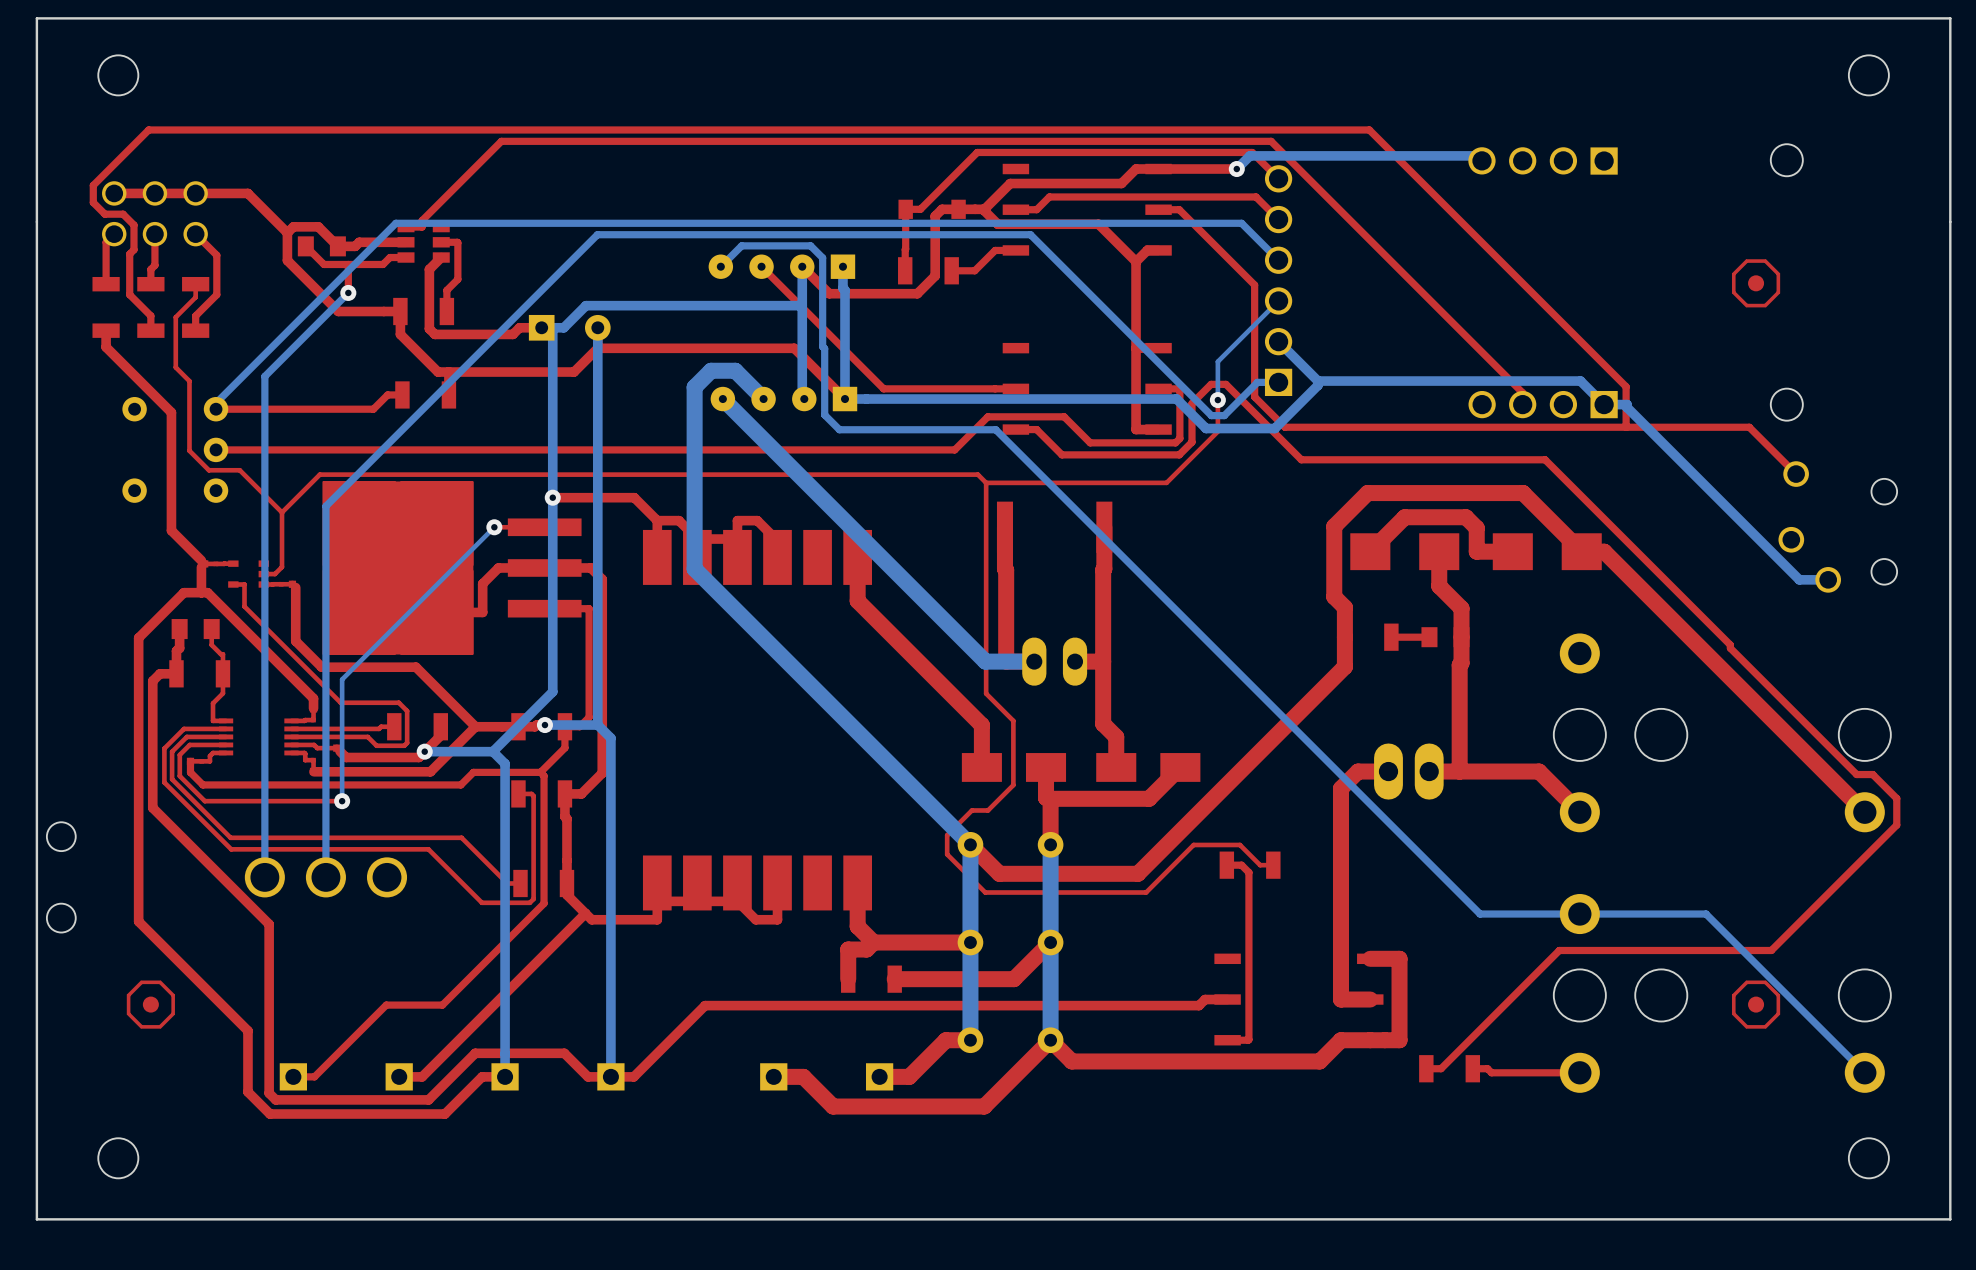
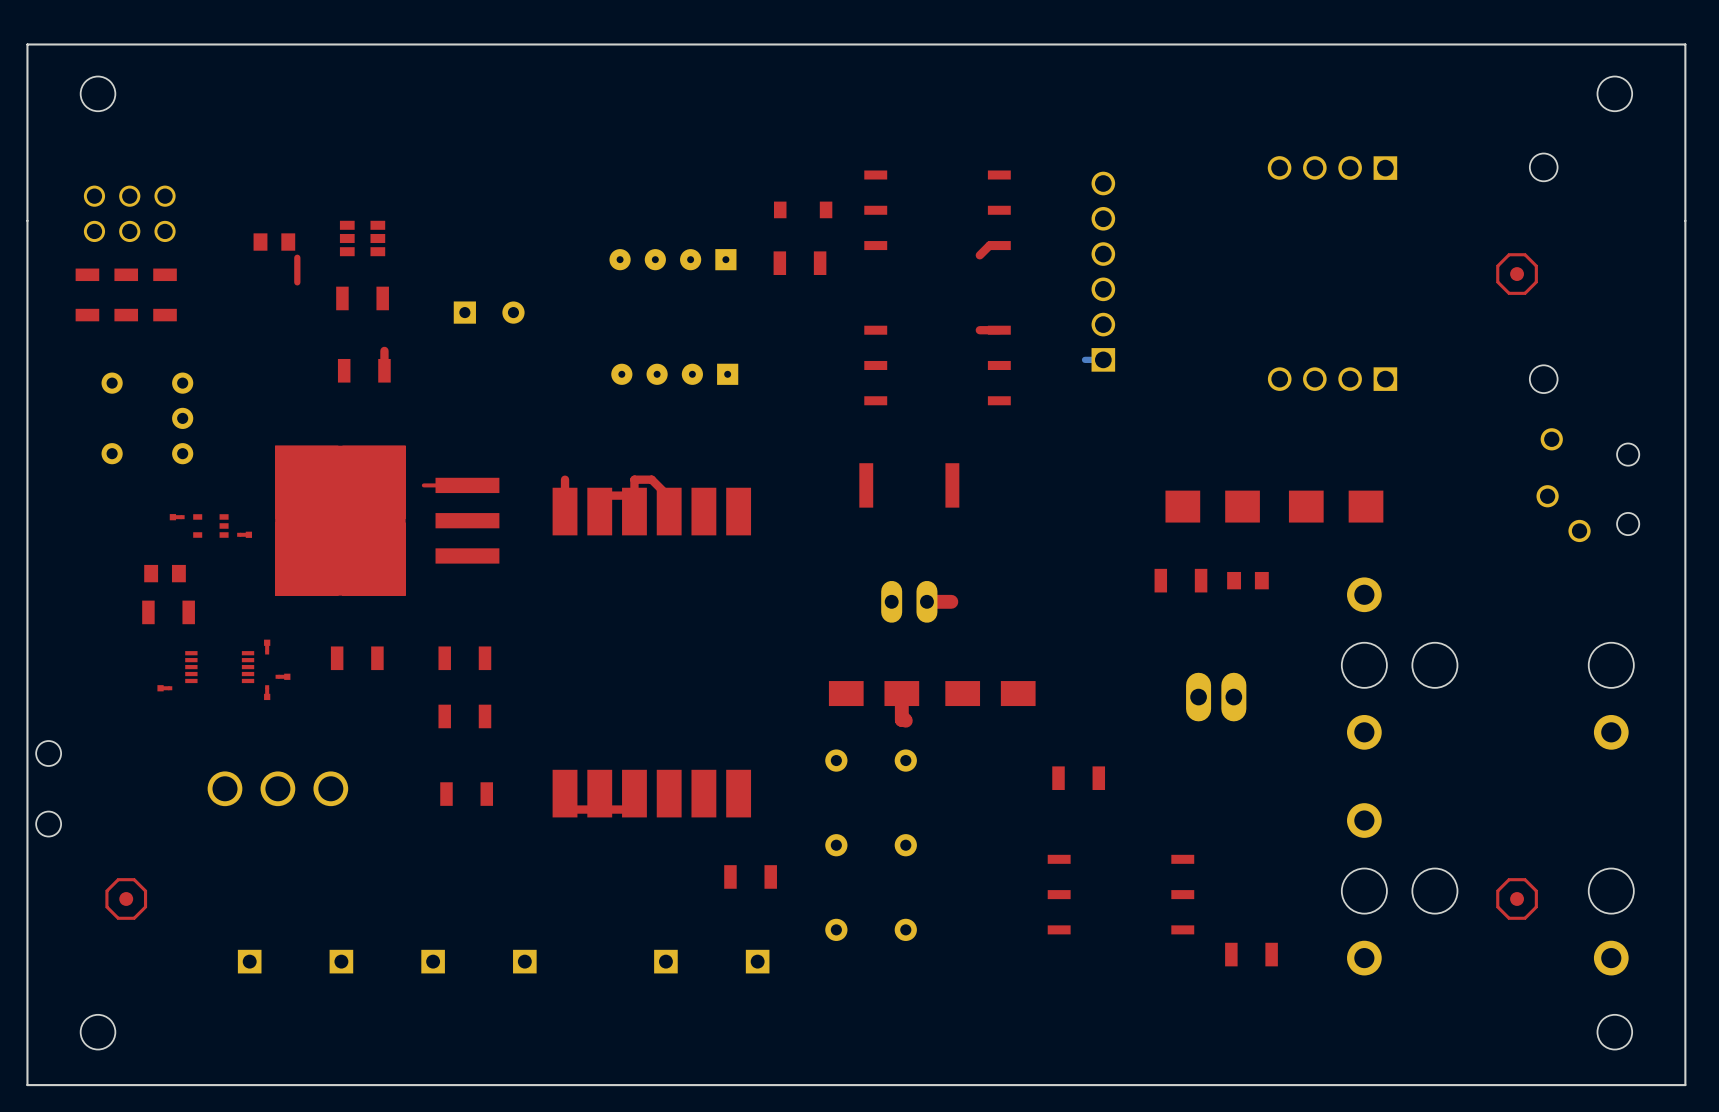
bottom track: (1481, 160) (1477, 155) (1249, 155) (1236, 169) -> none
top track: (1236, 169) (1136, 169) (1121, 183) (1010, 183) (983, 210) -> none
via: (1236, 169) -> none
top track: (1278, 178) (1252, 152) (977, 152) (920, 209) (905, 209) (905, 270) -> none
top track: (114, 193) (247, 193) (287, 232) -> none
top track: (1015, 209) (1036, 209) (1049, 196) (1256, 196) (1278, 219) -> none
top track: (1158, 209) (1179, 209) (1254, 285) (1254, 396) (1284, 427) (1749, 427) (1796, 474) -> none
top track: (406, 227) (422, 227) (422, 220) (501, 141) (1271, 141) (1522, 392) (1522, 404) -> none
top track: (287, 232) (293, 226) (318, 226) (337, 246) (355, 246) (359, 242) (406, 242) -> none
top track: (287, 232) (287, 260) (338, 311) (400, 311) (400, 334) (438, 372) (574, 372) (597, 348) -> none
top track: (114, 234) (106, 242) (106, 284) -> none
top track: (154, 234) (154, 265) (150, 269) (150, 284) -> none
top track: (195, 234) (216, 255) (216, 294) (195, 315) (195, 330) -> none
top track: (441, 242) (457, 242) (457, 279) (446, 290) (446, 311) -> none
top track: (305, 246) (323, 264) (383, 264) (389, 257) (406, 257) -> none
top track: (1015, 250) (995, 250) (974, 270) (951, 270) -> none
top track: (441, 257) (429, 269) (429, 328) (434, 334) (512, 334) (519, 327) (541, 327) -> none
bottom track: (1278, 260) (1241, 223) (395, 223) (216, 403) (216, 409) -> none
bottom track: (720, 266) (741, 245) (810, 245) (822, 257) (824, 414) (839, 429) (995, 429) (1480, 914) (1706, 914) (1864, 1072) -> none
top track: (761, 266) (883, 388) (1015, 388) -> none
top track: (802, 266) (829, 293) (917, 293) (935, 275) (935, 216) (942, 209) (982, 209) (997, 224) (1098, 224) (1136, 261) (1136, 429) (1158, 429) -> none
bottom track: (802, 266) (802, 396) (804, 399) -> none
bottom track: (842, 266) (842, 288) (845, 290) (845, 399) (1176, 399) (1206, 428) (1274, 428) (1317, 385) (1317, 381) -> none
top track: (195, 284) (195, 297) (175, 317) (175, 367) (189, 381) (189, 450) (208, 470) (239, 470) (282, 512) -> none
bottom track: (348, 292) (264, 376) (264, 877) -> none
via: (348, 292) -> none
bottom track: (1278, 300) (1217, 361) (1217, 400) -> none
bottom track: (802, 305) (585, 305) (563, 327) (541, 327) -> none
bottom track: (552, 327) (552, 691) (492, 751) -> none
bottom track: (597, 327) (597, 725) -> none
top track: (106, 330) (106, 347) (171, 412) (171, 530) (204, 563) (201, 567) (201, 592) -> none
top track: (150, 330) (150, 315) (129, 294) (129, 254) (133, 249) (133, 225) (123, 214) (104, 214) (93, 202) (93, 185) (148, 129) (1369, 129) (1626, 386) (1626, 427) -> none
bottom track: (1278, 341) (1317, 381) -> none
top track: (597, 348) (794, 348) (845, 399) -> none
bottom track: (1317, 381) (1580, 381) (1604, 404) (1627, 404) (1627, 407) (1799, 579) (1828, 579) -> none
bottom track: (1257, 382) (1224, 415) (1211, 415) (1030, 234) (597, 234) (325, 506) (325, 877) -> none
top track: (1158, 388) (1179, 389) (1179, 438) (1175, 442) (1090, 442) (1064, 416) (987, 416) (954, 449) (216, 449) -> none
top track: (402, 394) (387, 394) (373, 409) (216, 409) -> none
bottom track: (722, 399) (985, 661) (1034, 661) -> none
bottom track: (763, 399) (735, 370) (711, 370) (694, 387) (694, 568) (970, 844) (970, 1040) -> none
top track: (1217, 400) (1217, 431) (1166, 482) (986, 482) -> none
via: (1217, 400) -> none
top track: (1015, 429) (1036, 429) (1061, 454) (1179, 454) (1191, 442) (1191, 403) (1211, 384) (1225, 384) (1301, 459) (1545, 459) (1856, 774) (1872, 774) (1896, 798) (1896, 825) (1771, 950) (1559, 950) (1441, 1068) (1426, 1068) -> none
top track: (986, 482) (986, 693) (1013, 720) (1013, 785) (988, 810) (971, 810) (947, 835) (947, 854) (985, 892) (1146, 892) (1193, 844) (1239, 844) (1260, 865) (1273, 865) -> none
top track: (986, 482) (977, 474) (319, 474) (282, 512) -> none
top track: (552, 497) (634, 497) (657, 520) (678, 520) (697, 539) (697, 557) -> none
via: (552, 497) -> none
top track: (282, 512) (282, 567) (274, 574) (263, 574) -> none
bottom track: (494, 527) (342, 679) (342, 801) -> none
via: (494, 527) -> none
top track: (1004, 527) (1006, 661) (1034, 661) -> none
top track: (1104, 527) (1103, 723) (1116, 737) (1116, 767) -> none
top track: (1439, 551) (1439, 586) (1461, 608) (1459, 771) -> none
top track: (1512, 551) (1476, 551) (1476, 528) (1465, 517) (1404, 517) (1370, 551) -> none
top track: (857, 557) (857, 600) (981, 725) (981, 767) -> none
top track: (233, 563) (215, 563) -> none
top track: (233, 584) (244, 584) (244, 606) (340, 702) (398, 702) (407, 711) (407, 742) (404, 745) (376, 745) (367, 736) (291, 736) -> none
top track: (281, 584) (263, 584) -> none
top track: (292, 584) (295, 587) (295, 641) (321, 667) (415, 667) (475, 726) -> none
top track: (544, 608) (589, 608) (589, 717) (579, 726) (564, 726) (564, 747) (540, 772) -> none
top track: (359, 612) (482, 612) (482, 583) (498, 567) (590, 567) (602, 579) (602, 773) (581, 793) (564, 793) (564, 816) (566, 818) (566, 894) (591, 919) (657, 919) (657, 882) -> none
top track: (179, 629) (179, 648) (176, 650) (176, 673) (159, 673) (152, 681) (152, 807) (269, 924) (269, 1093) (275, 1099) (428, 1099) (475, 1053) (564, 1053) (587, 1076) (633, 1076) (705, 1005) (1198, 1005) (1205, 999) (1227, 999) -> none
top track: (211, 629) (211, 645) (222, 654) (222, 693) (213, 703) (213, 720) (226, 720) -> none
top track: (1429, 637) (1391, 637) -> none
top track: (313, 708) (313, 698) (207, 592) (183, 592) (138, 637) (138, 921) (247, 1030) (247, 1092) (269, 1114) (445, 1114) (482, 1076) (505, 1076) -> none
top track: (313, 720) (291, 720) -> none
top track: (544, 725) (475, 726) -> none
via: (544, 725) -> none
bottom track: (597, 725) (610, 738) (610, 1076) -> none
bottom track: (597, 725) (544, 725) -> none
top track: (394, 726) (381, 726) (378, 728) (291, 728) -> none
top track: (440, 726) (440, 735) (418, 757) (346, 757) (336, 748) -> none
top track: (475, 726) (430, 771) (313, 771) -> none
top track: (226, 728) (184, 728) (164, 748) (164, 782) (231, 849) (428, 849) (481, 902) (529, 902) (533, 899) (533, 795) (531, 793) (518, 793) -> none
top track: (226, 736) (186, 736) (172, 751) (172, 779) (230, 837) (461, 837) (507, 883) (520, 883) -> none
top track: (226, 744) (189, 744) (179, 754) (179, 776) (204, 801) (342, 801) -> none
top track: (291, 744) (314, 744) (317, 748) (325, 748) -> none
via: (424, 751) -> none
bottom track: (492, 751) (505, 763) (505, 1076) -> none
bottom track: (492, 751) (424, 751) -> none
top track: (226, 752) (213, 752) (209, 756) (209, 761) (201, 761) -> none
top track: (291, 752) (304, 752) (305, 760) (313, 760) -> none
top track: (190, 761) (190, 772) (202, 784) (460, 784) (473, 772) (540, 772) -> none
top track: (1180, 767) (1149, 798) (1050, 798) (1050, 844) -> none
top track: (1388, 771) (1358, 771) (1341, 788) (1341, 999) (1370, 999) -> none
top track: (1429, 771) (1539, 771) (1579, 812) -> none
top track: (540, 772) (544, 775) (544, 903) (442, 1005) (386, 1005) (314, 1076) (293, 1076) -> none
via: (342, 801) -> none
top track: (1864, 812) (1604, 551) (1581, 551) (1523, 493) (1367, 493) (1334, 526) (1334, 596) (1344, 607) (1344, 666) (1137, 873) (999, 873) (970, 844) -> none
bottom track: (1050, 844) (1050, 1040) -> none
top track: (1226, 865) (1241, 865) (1248, 872) (1248, 1039) (1227, 1040) -> none
top track: (777, 882) (777, 919) (755, 919) (737, 901) (737, 882) -> none
top track: (857, 882) (857, 926) (873, 942) -> none
top track: (585, 913) (422, 1076) (399, 1076) -> none
top track: (873, 942) (866, 949) (848, 949) (848, 979) -> none
top track: (970, 942) (873, 942) -> none
top track: (1050, 942) (1013, 979) (894, 979) -> none
top track: (1370, 958) (1399, 958) (1399, 1040) (1341, 1040) (1319, 1061) (1071, 1061) (1050, 1040) (984, 1106) (833, 1106) (803, 1076) (773, 1076) -> none
top track: (970, 1040) (945, 1040) (909, 1076) (879, 1076) -> none
top track: (1472, 1068) (1487, 1068) (1491, 1072) (1579, 1072) -> none

